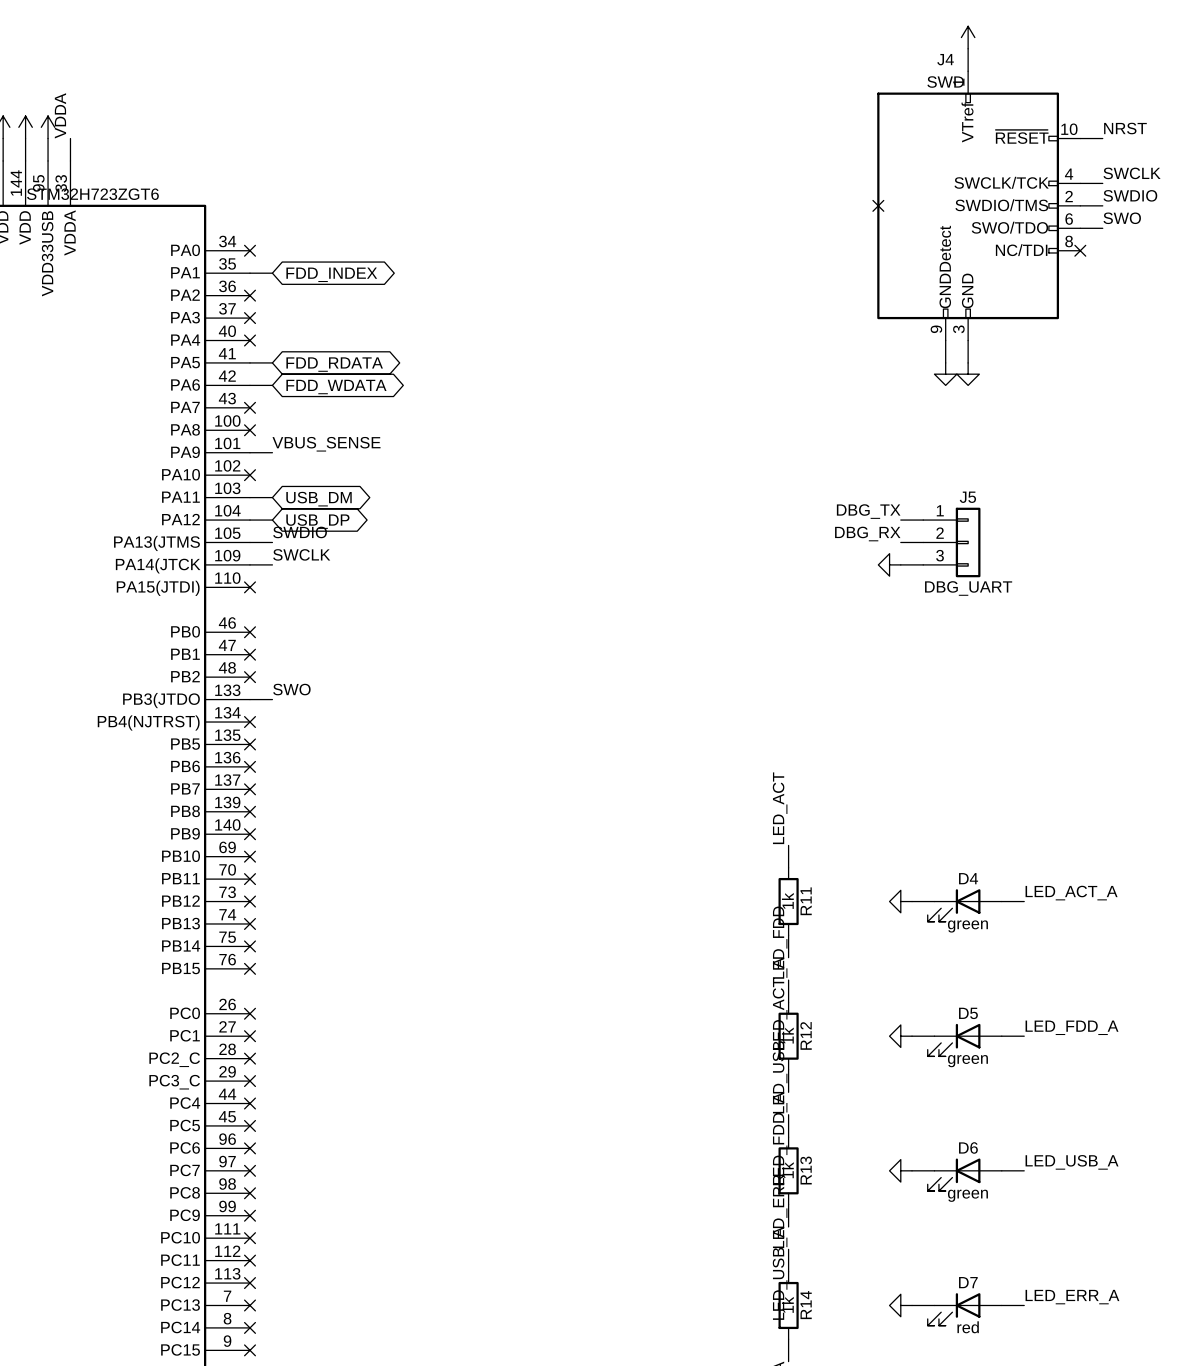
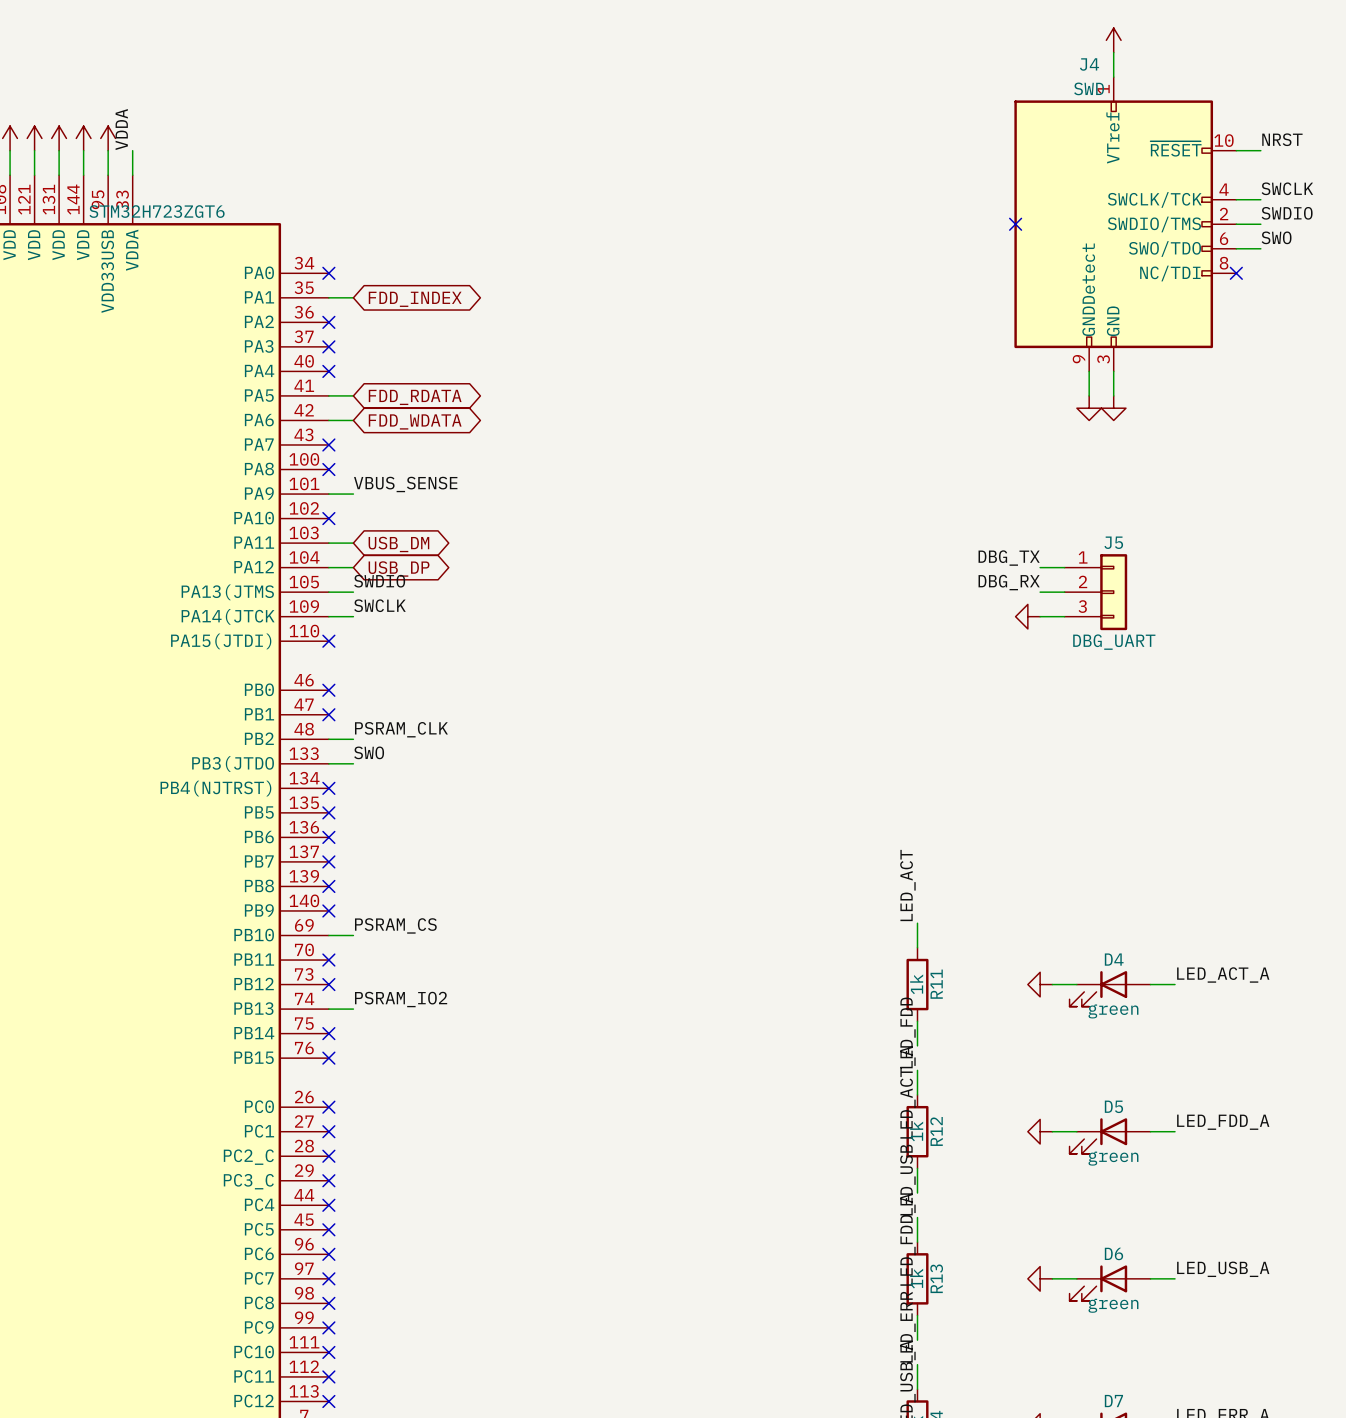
label: none -> PSRAM_CLK (401, 729)
wire: none -> (328, 739) (353, 739)
no-connect mark: (250, 677) -> none
label: none -> PSRAM_CS (395, 925)
wire: none -> (328, 935) (353, 935)
no-connect mark: (250, 856) -> none
label: none -> PSRAM_IO2 (401, 999)
wire: none -> (328, 1009) (353, 1009)
no-connect mark: (250, 923) -> none

